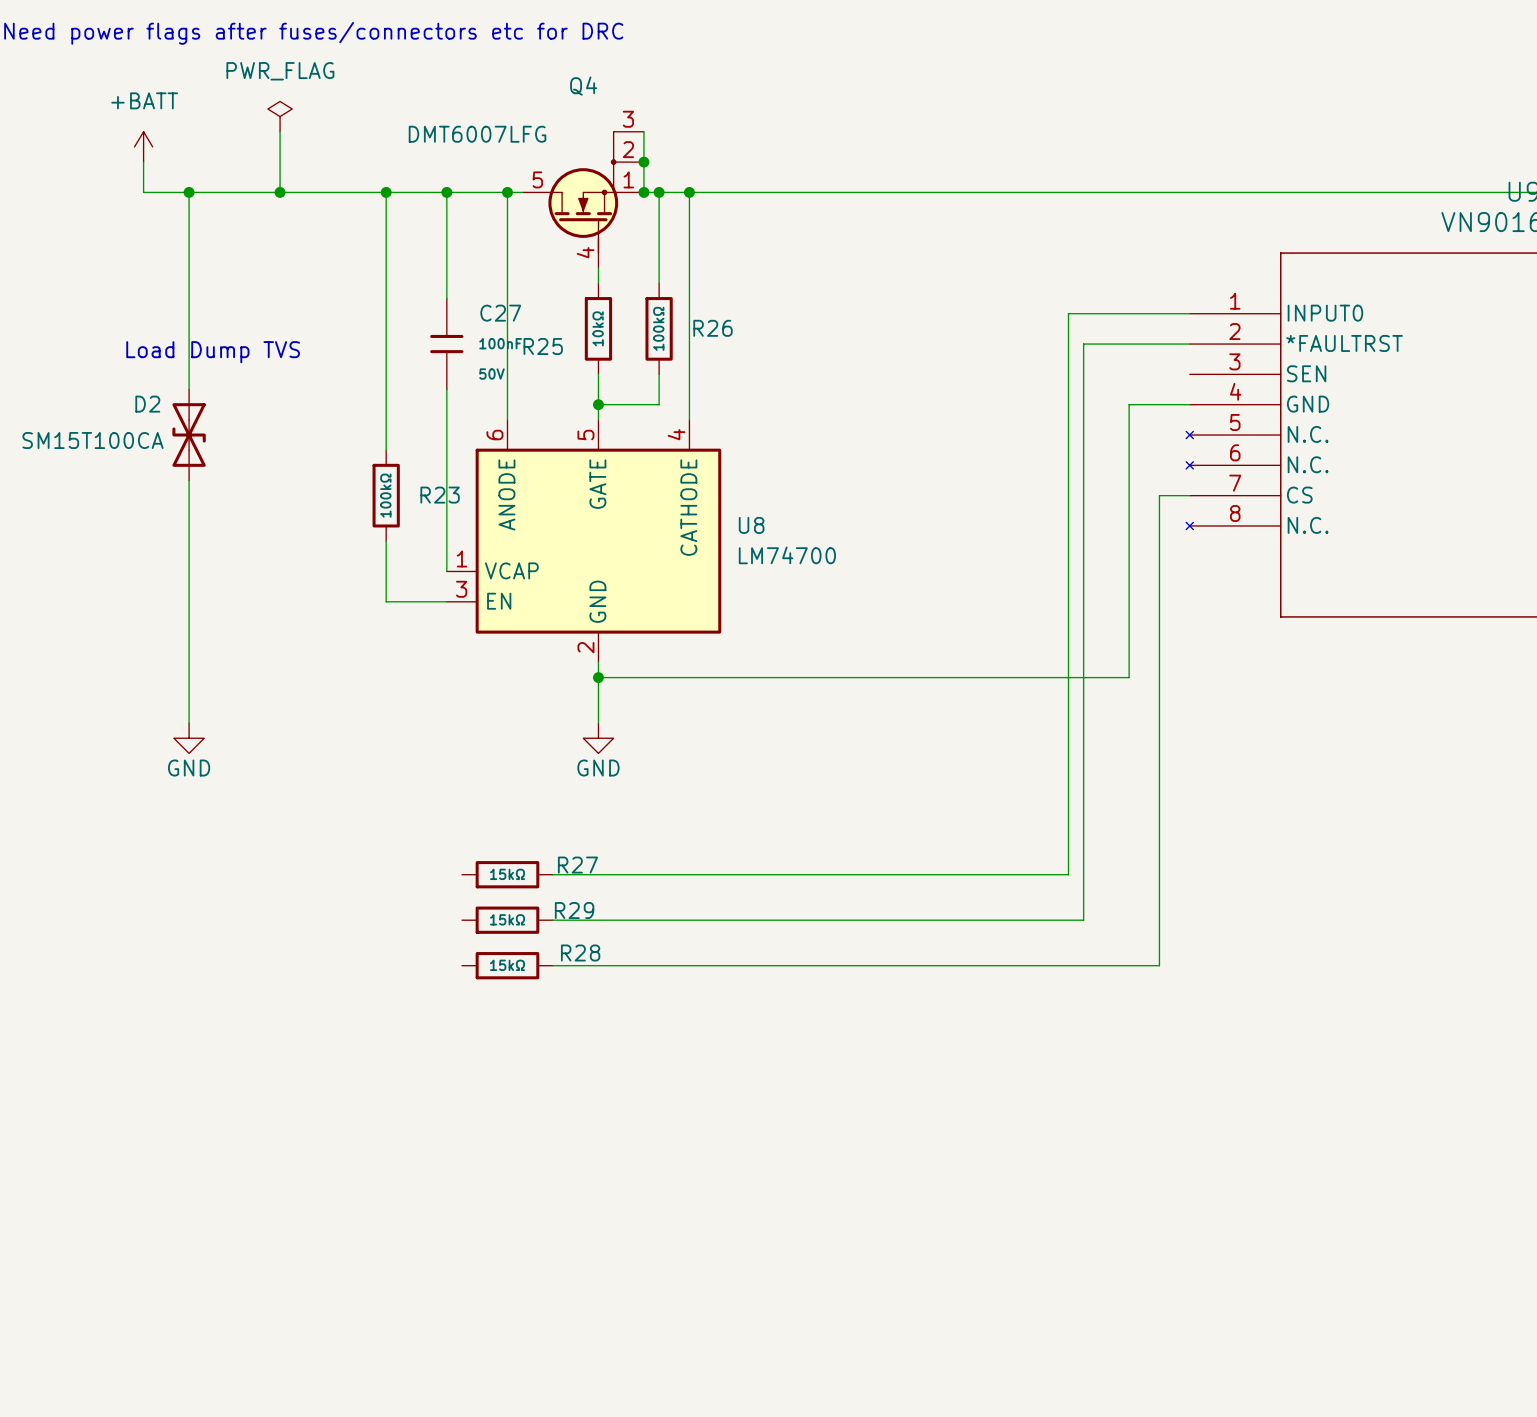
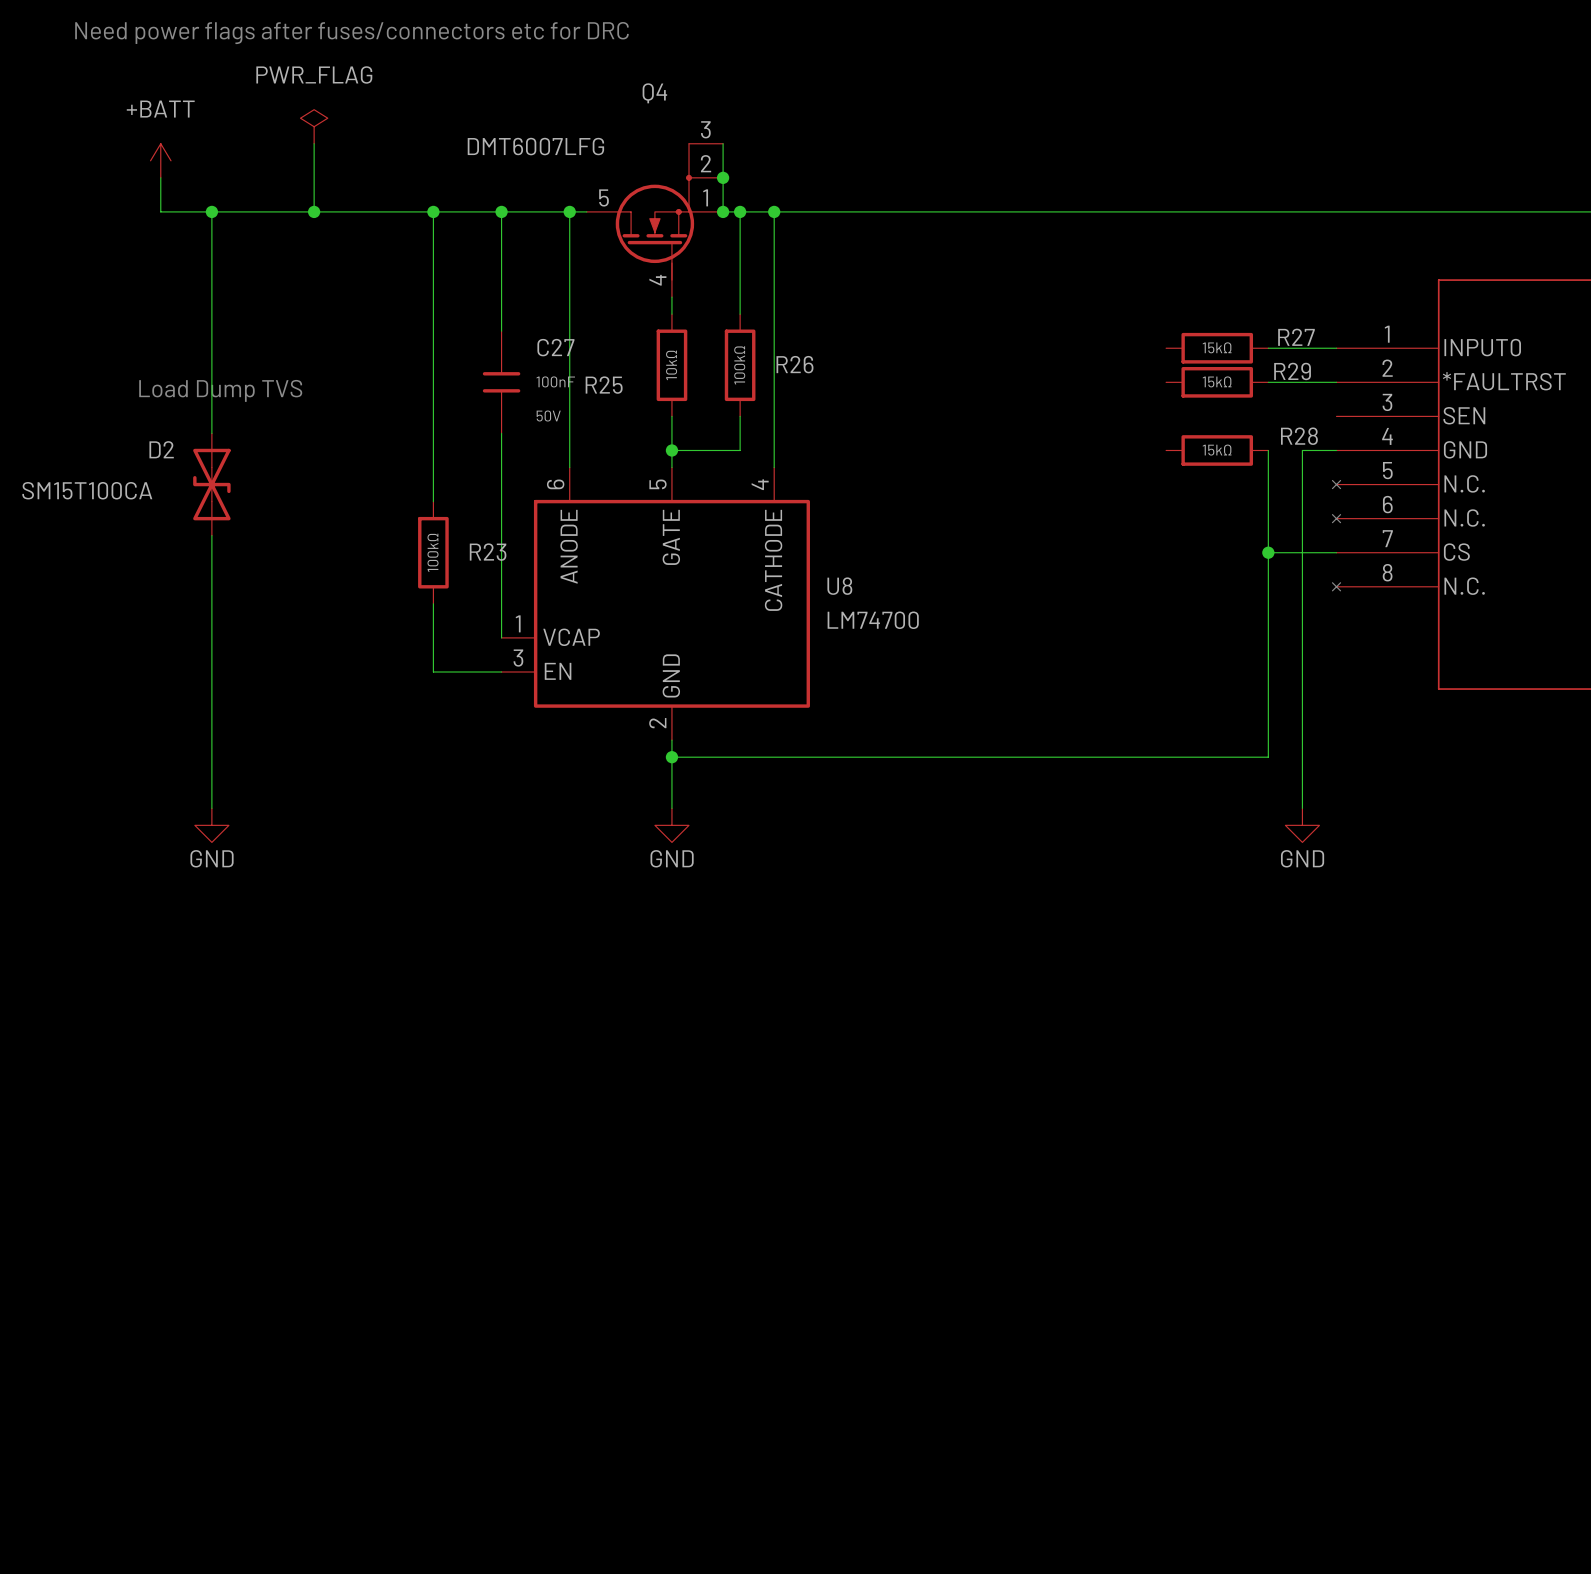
wire: (1129, 313) (1068, 313) (1068, 874) (552, 874) -> none
wire: (1129, 344) (1083, 344) (1083, 920) (552, 920) -> none
wire: (1129, 404) (1159, 404) -> (1268, 552) (1302, 552) (1302, 450)
junction: none -> (1268, 552)
wire: (1159, 723) (1159, 965) (552, 965) -> none
power symbol: none -> GND (1302, 825)
R27 position: (507, 874) -> (1217, 348)
R29 position: (507, 920) -> (1217, 382)
R28 position: (507, 965) -> (1217, 450)

